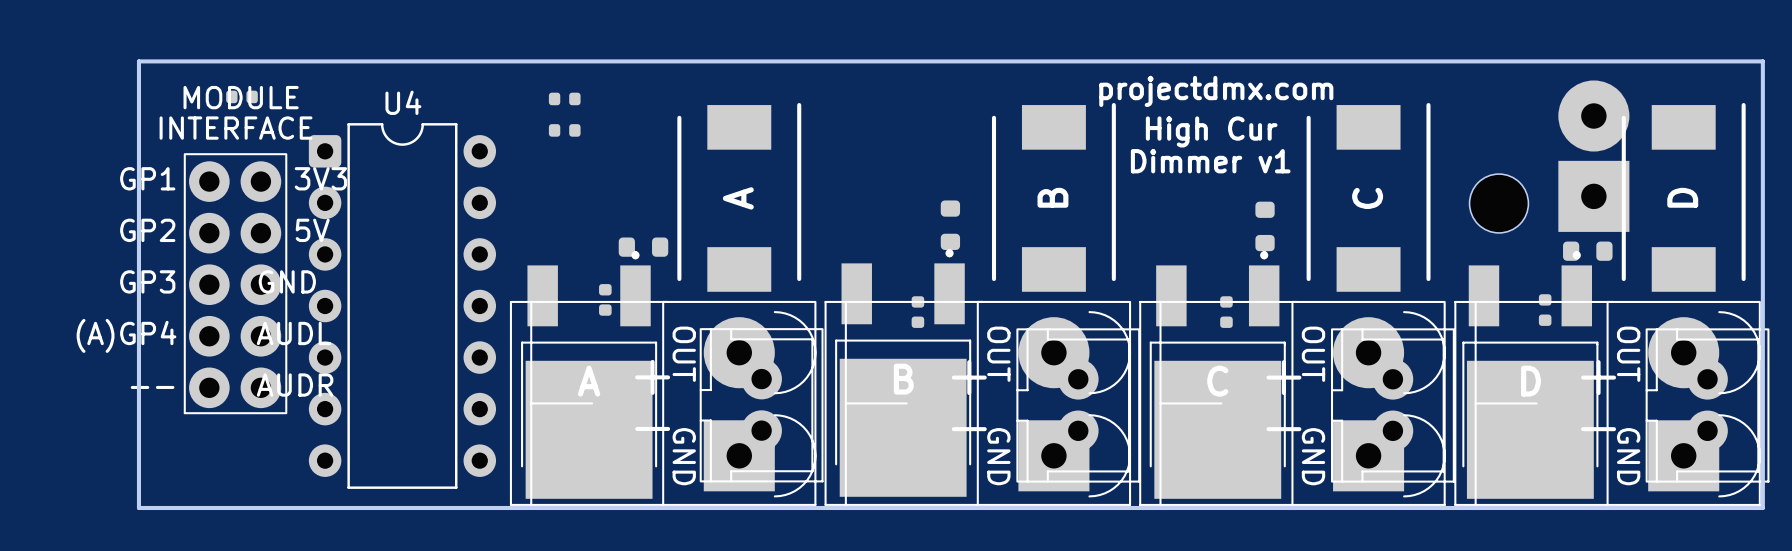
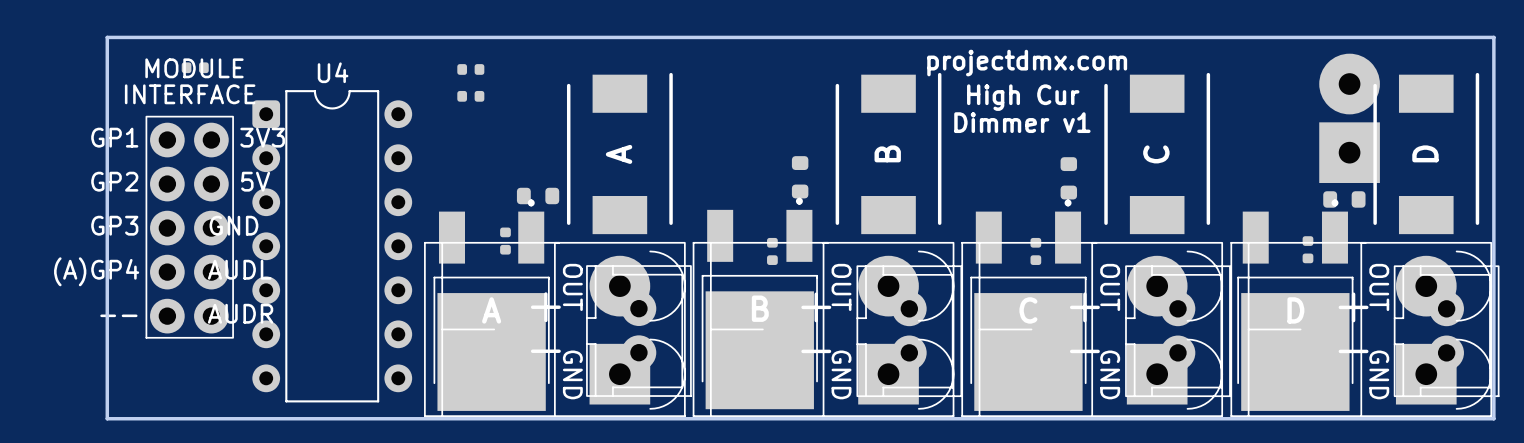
part: (1498, 203) -> none

